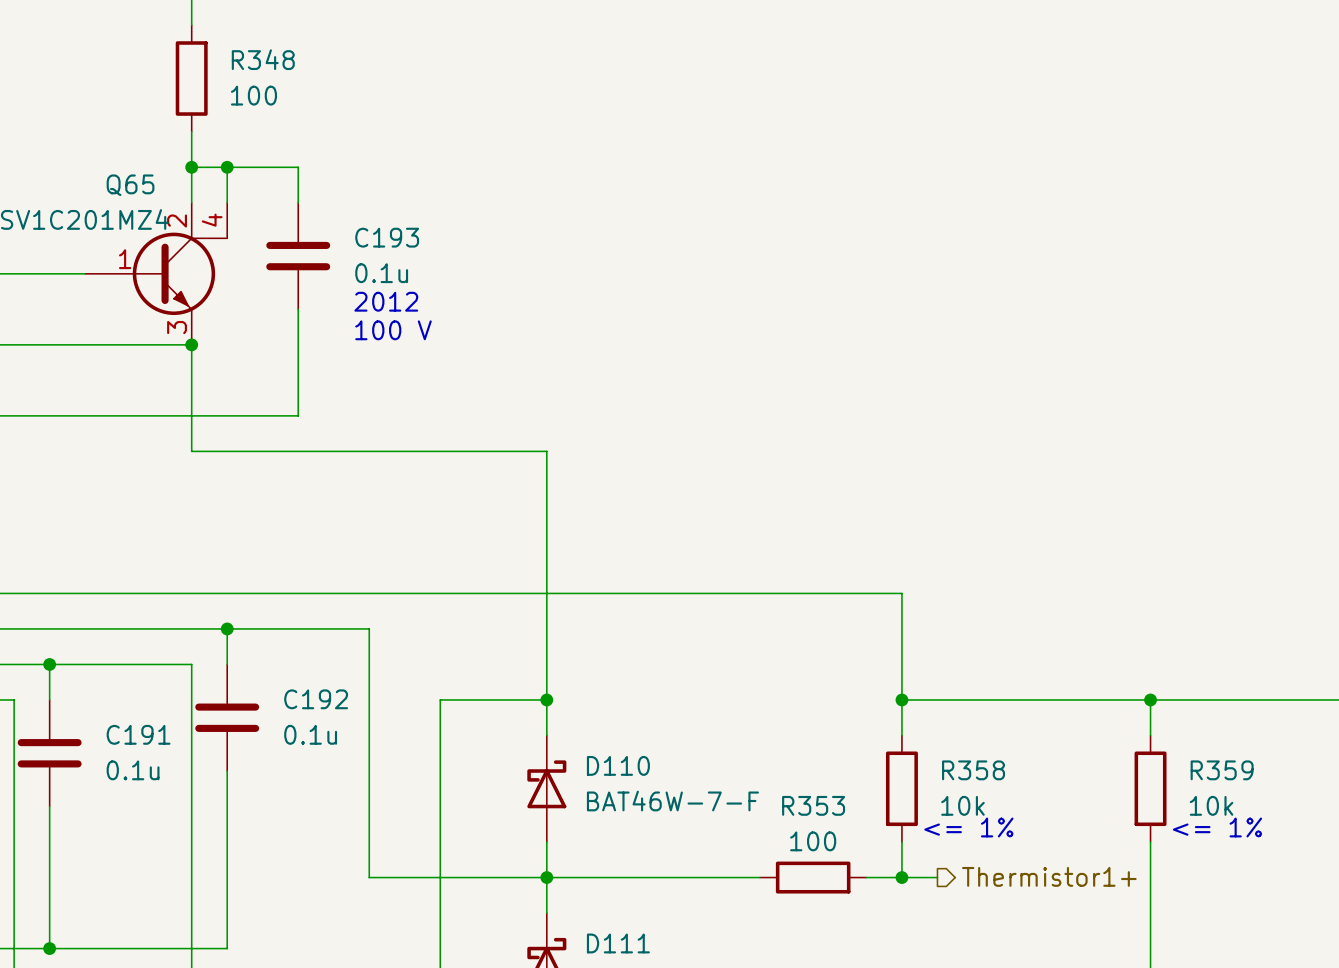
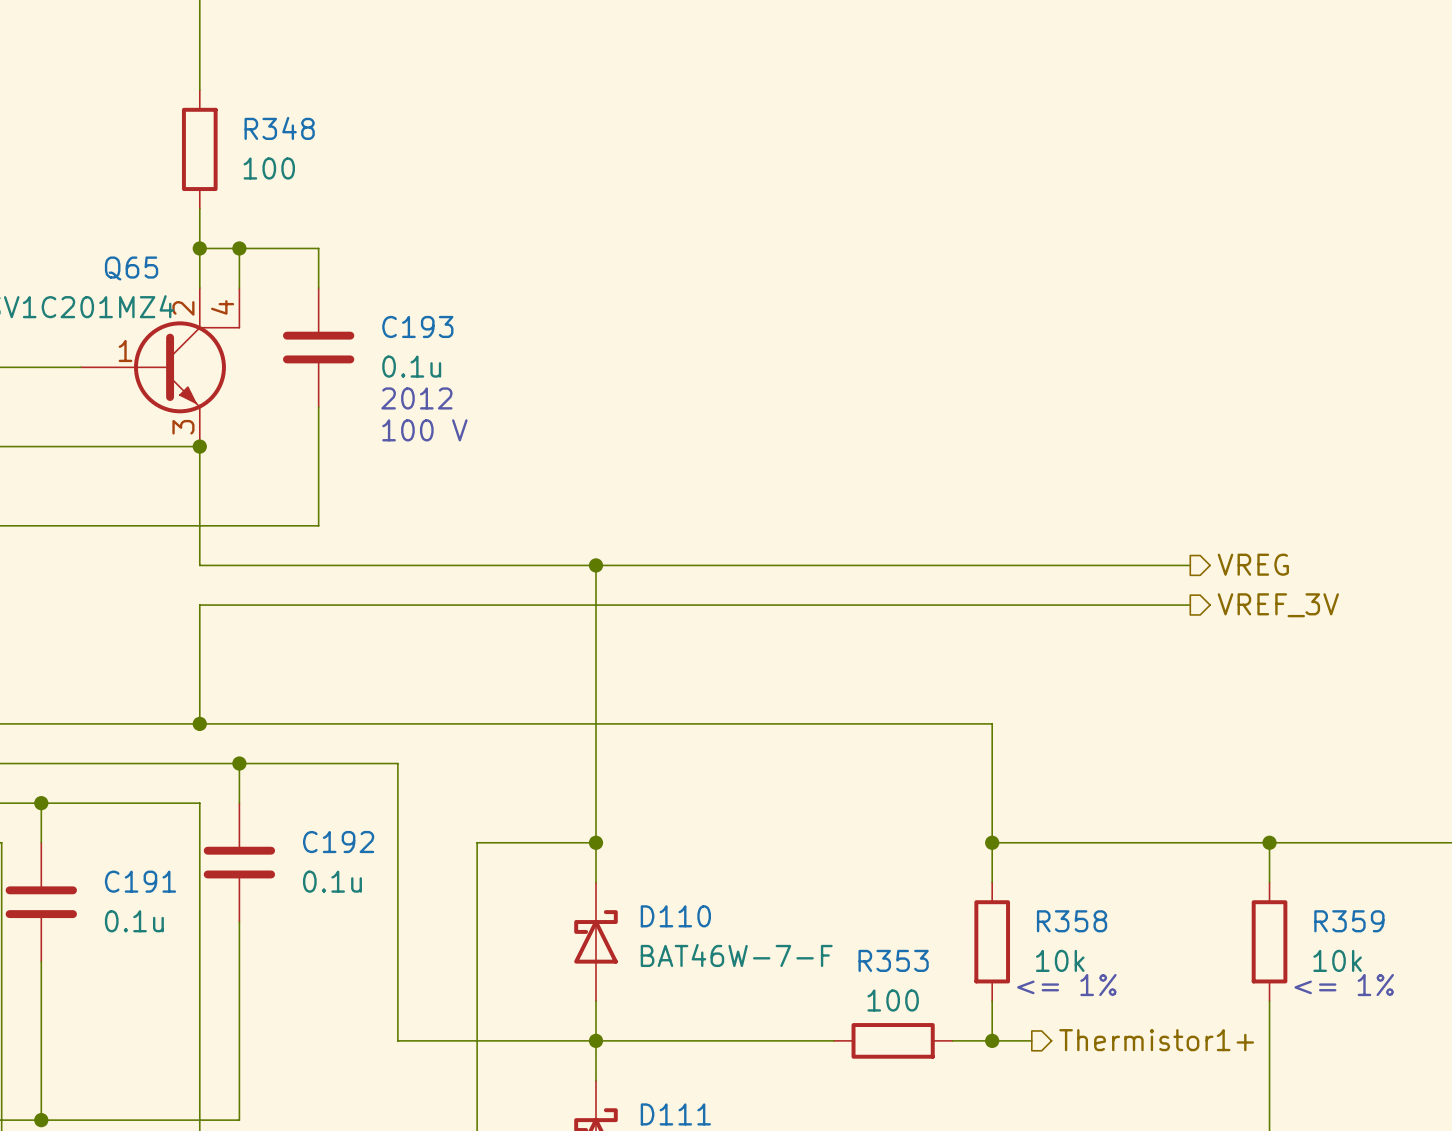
hierarchical label: none -> VREG (1253, 564)
wire: none -> (595, 565) (1190, 565)
junction: none -> (595, 565)
wire: none -> (1190, 605) (199, 605) (199, 723)
hierarchical label: none -> VREF_3V (1278, 605)
junction: none -> (199, 723)

